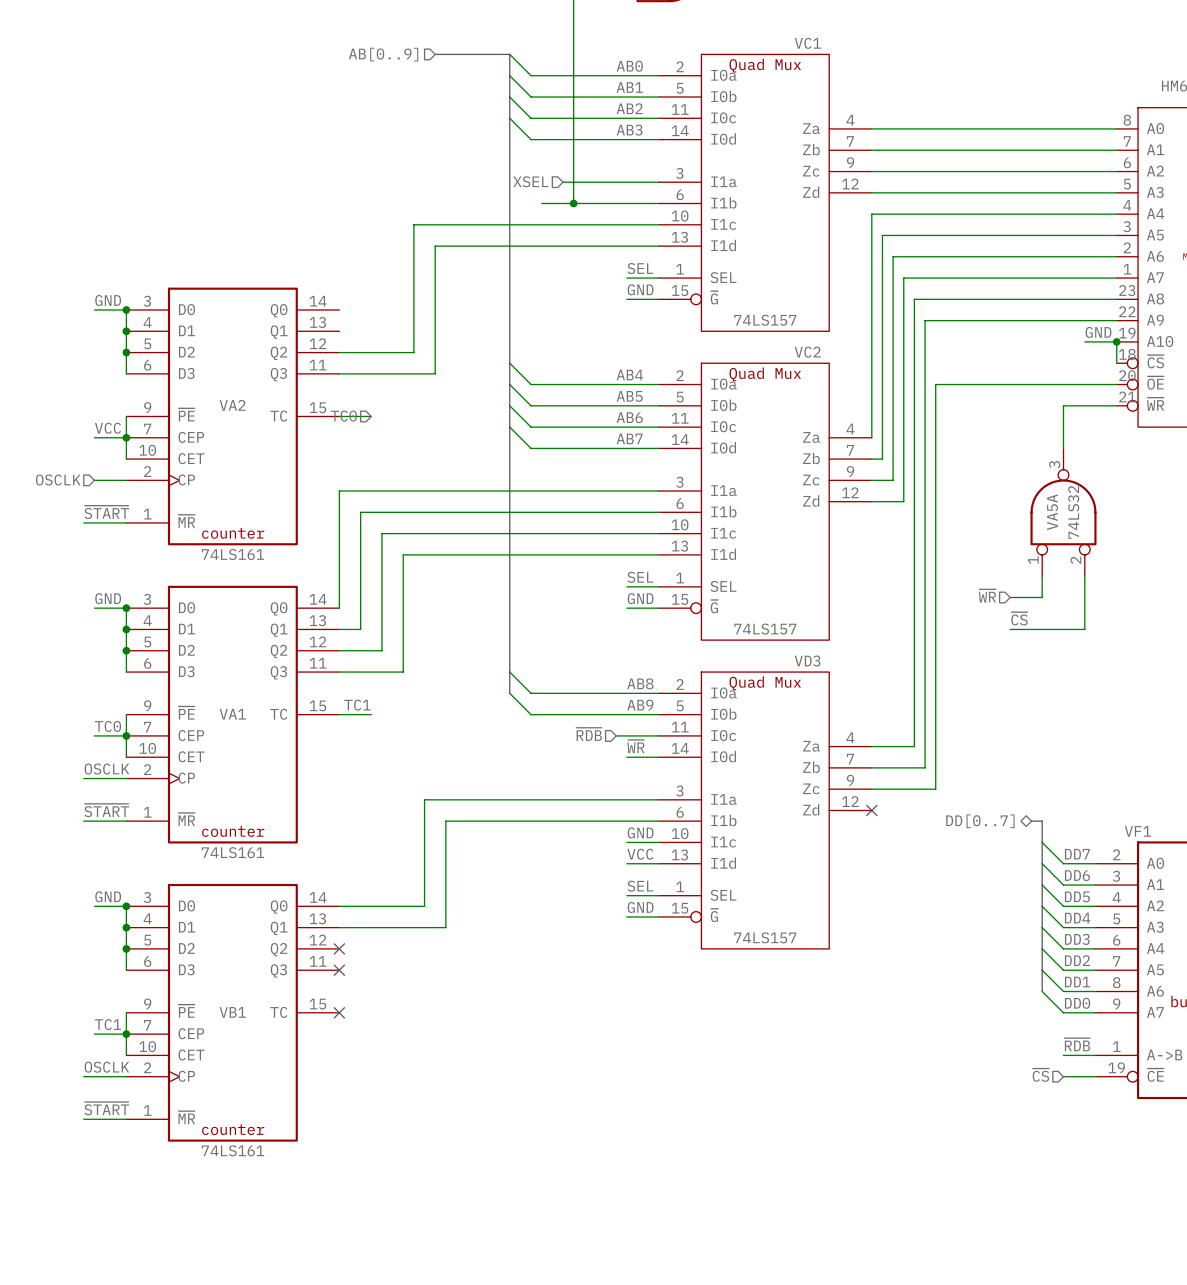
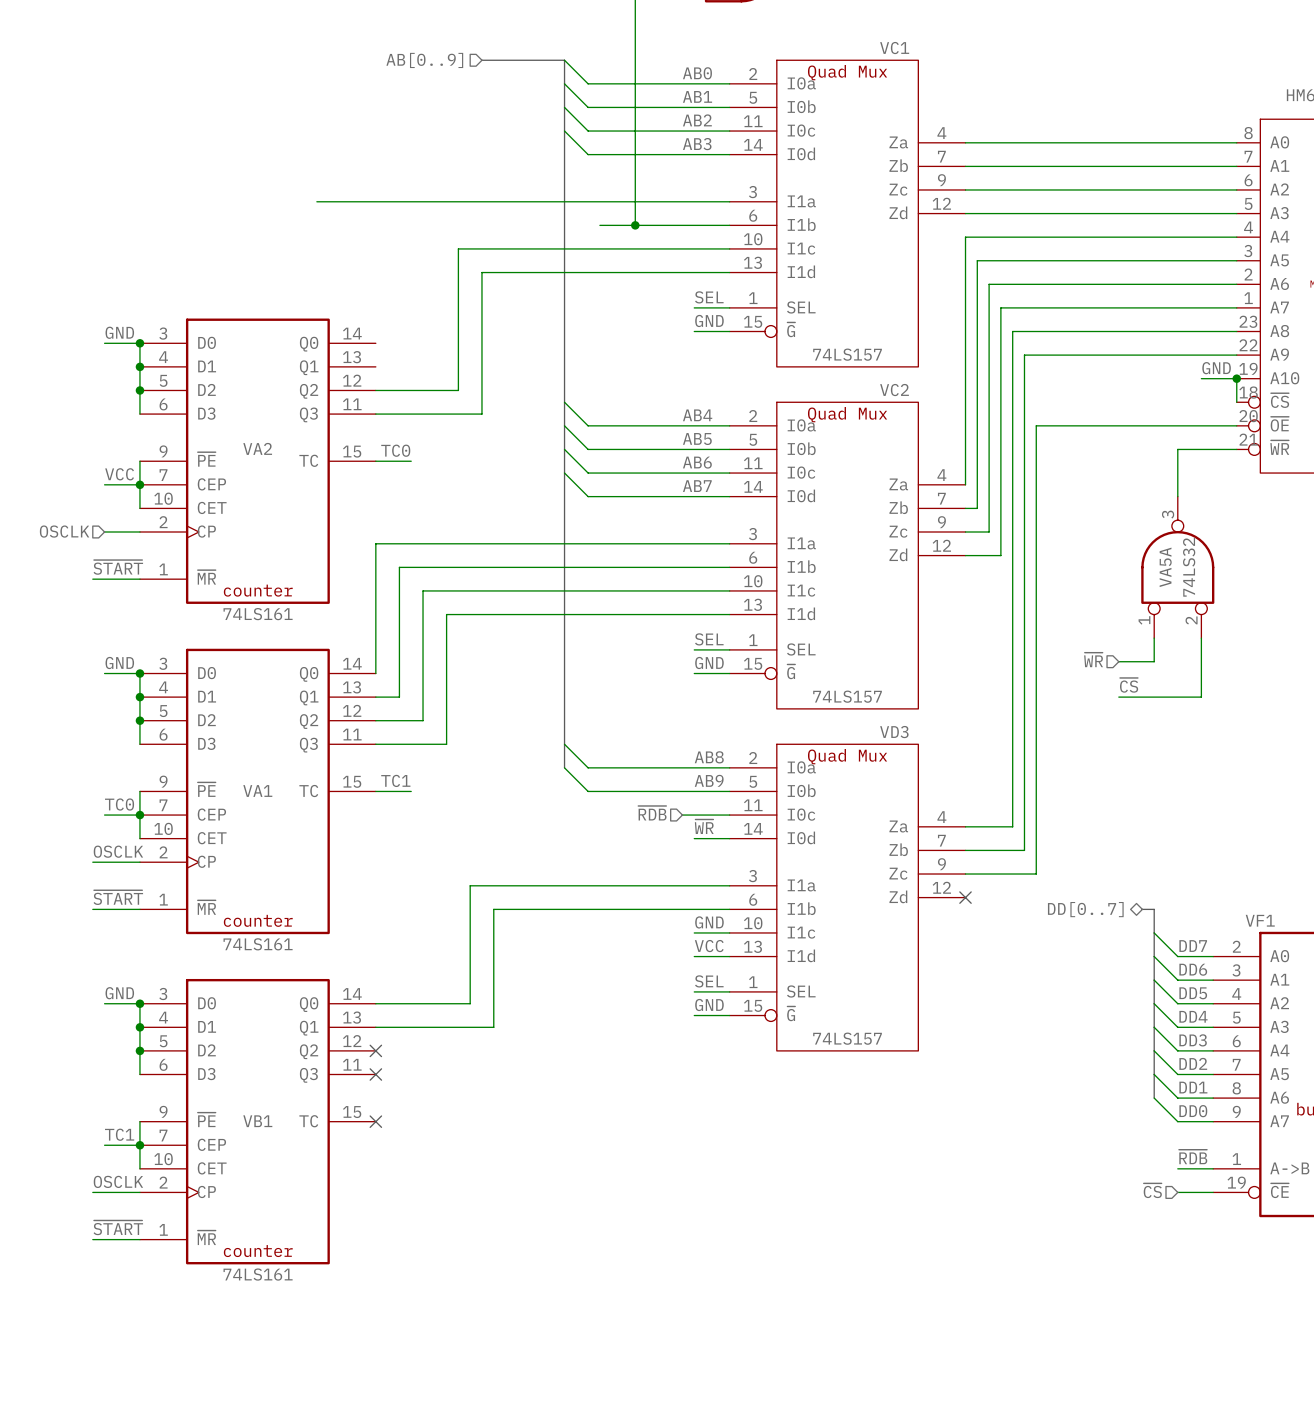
hierarchical label: XSEL (530, 181) -> none
wire: none -> (316, 201) (623, 201)
label: none -> TC0 (395, 450)
hierarchical label: TC0 (343, 416) -> none

